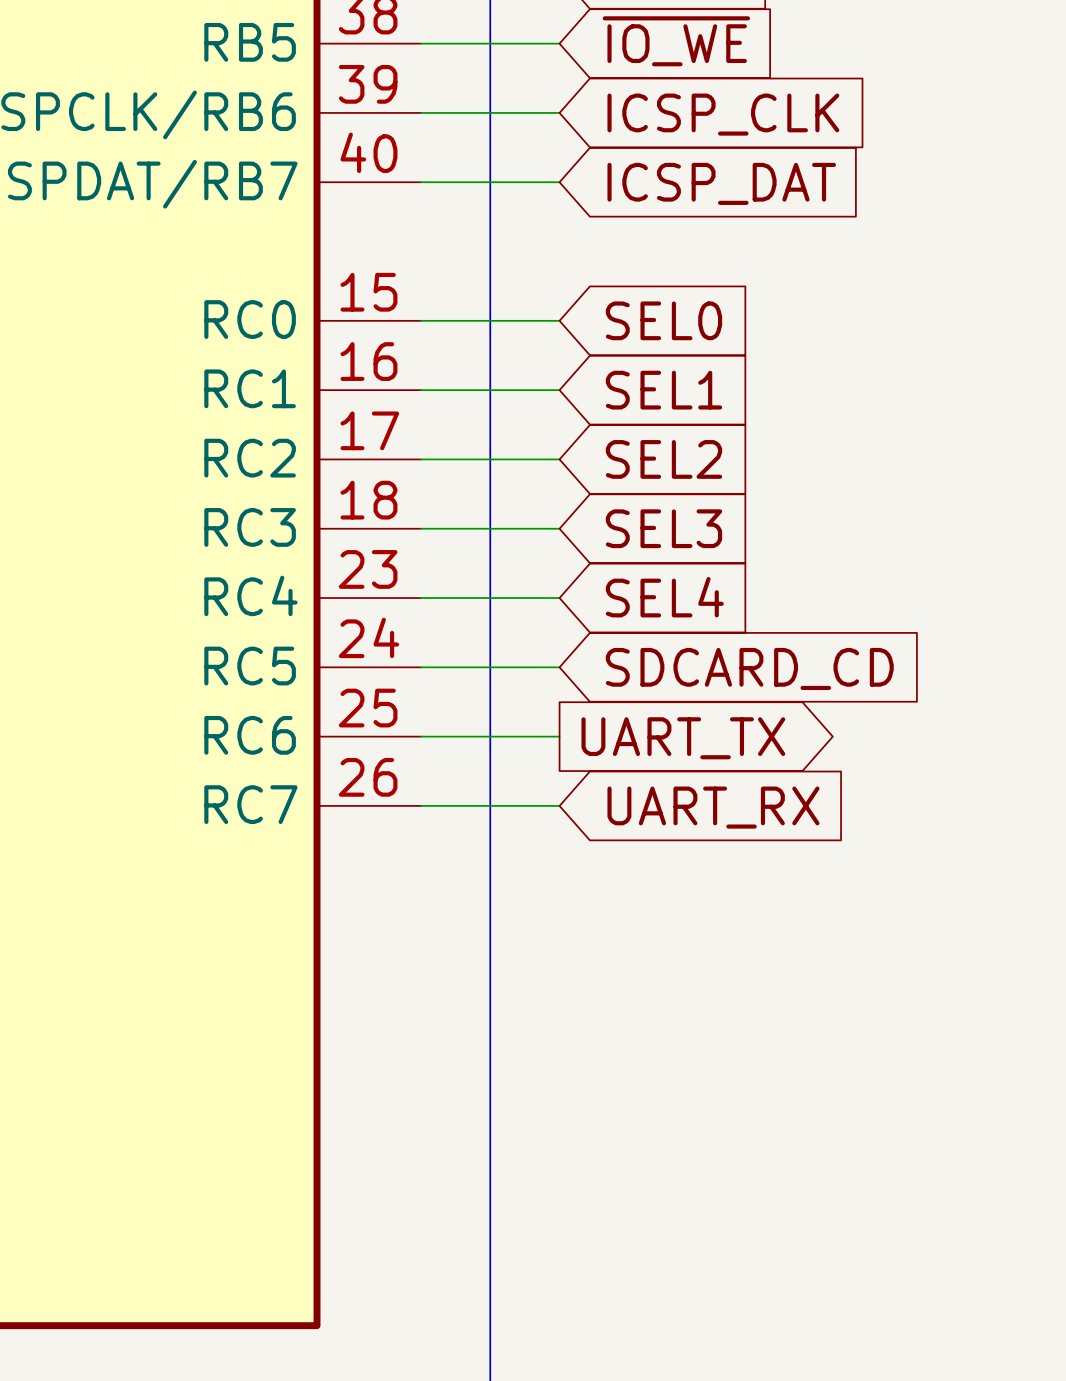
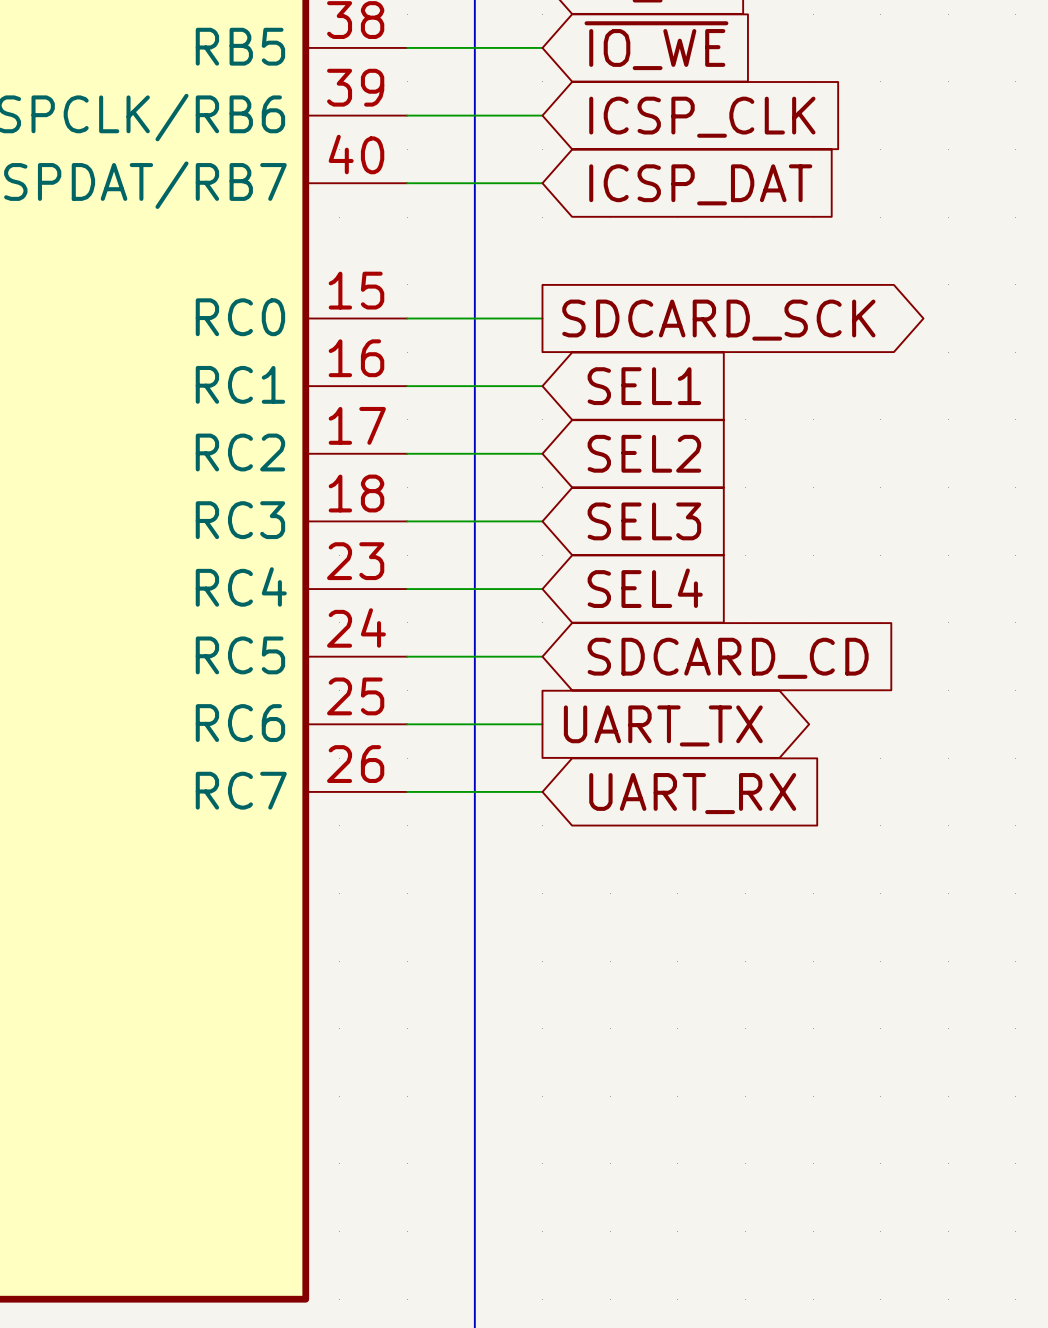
global label shape: input (663, 320) -> output (718, 320)
global label: SEL0 (663, 320) -> SDCARD_SCK (718, 320)

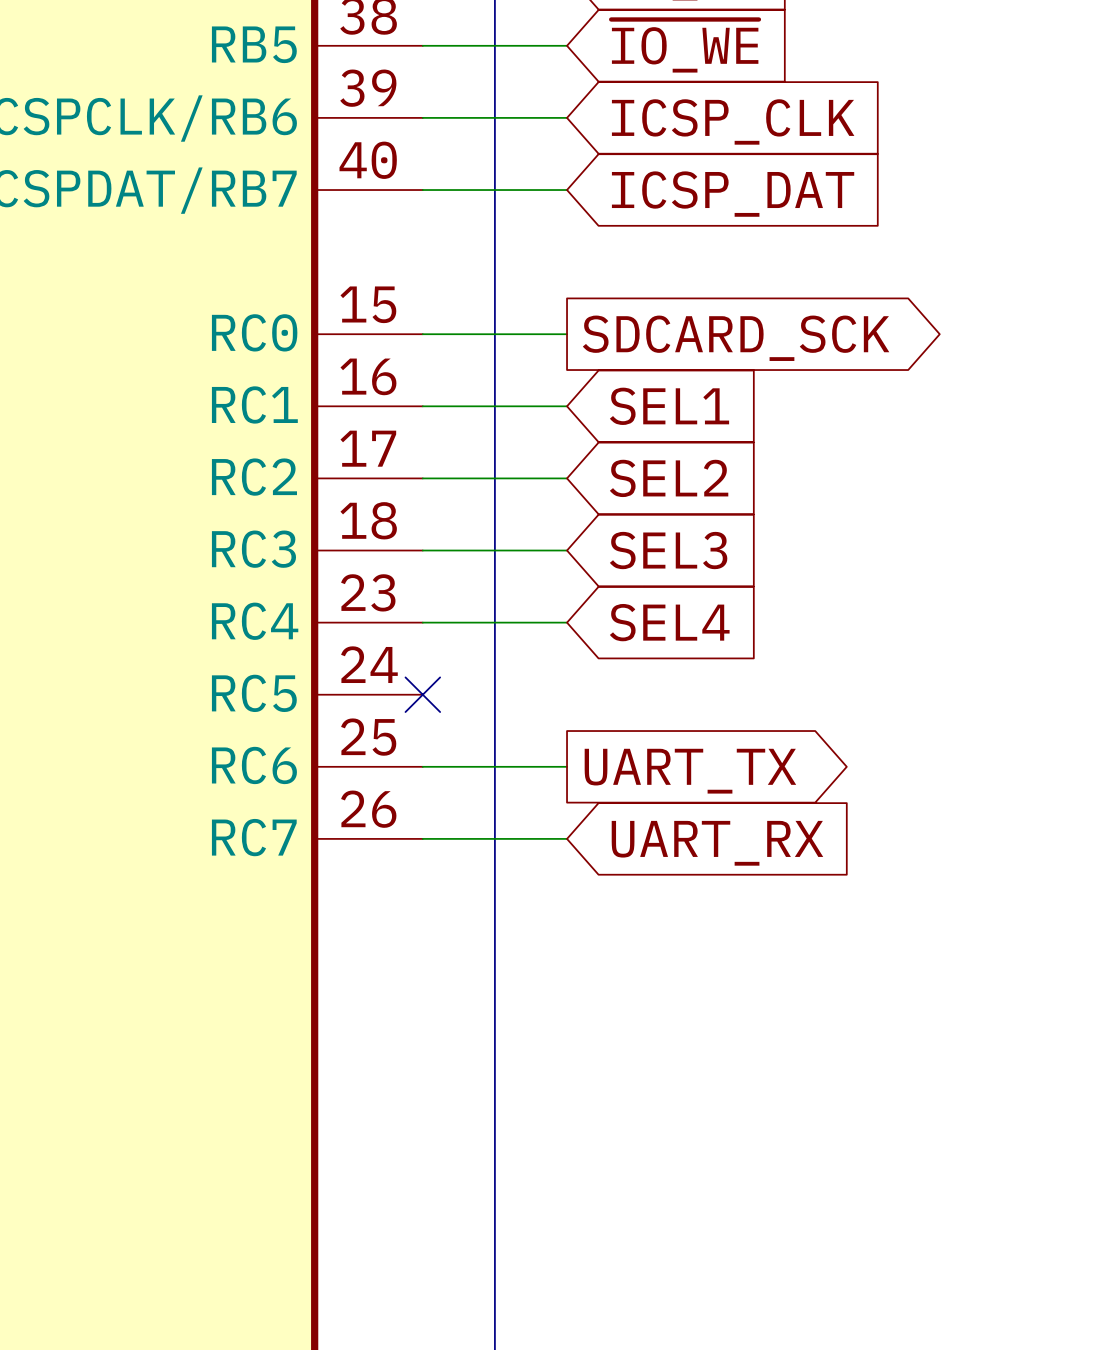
wire: (407, 656) (542, 656) -> none
no-connect mark: none -> (422, 694)
global label: SDCARD_CD (728, 658) -> none

